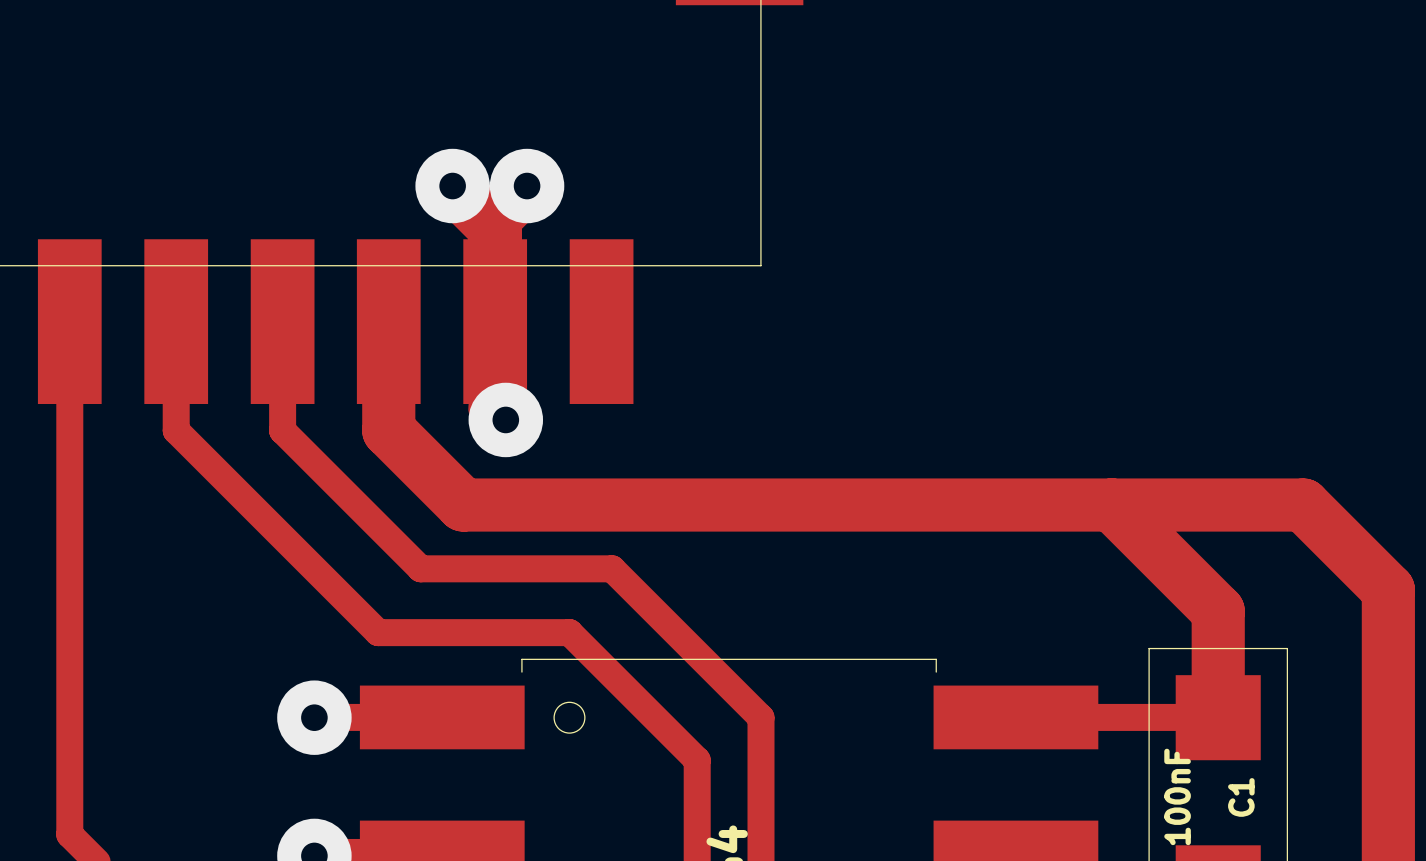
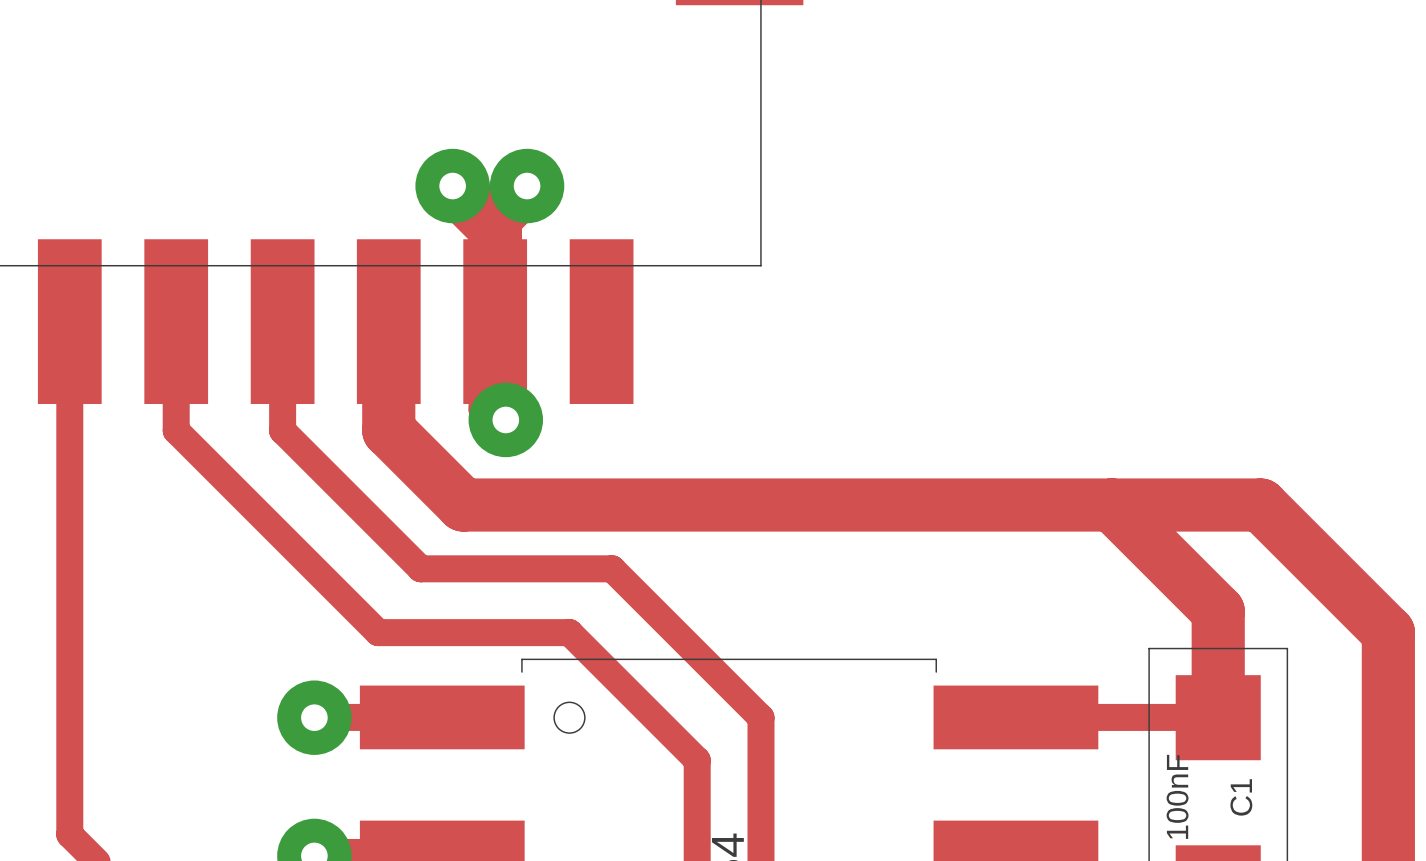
track: (1260, 505) (1303, 505) (1388, 590) (1388, 632) -> (1260, 505) (1388, 632)

